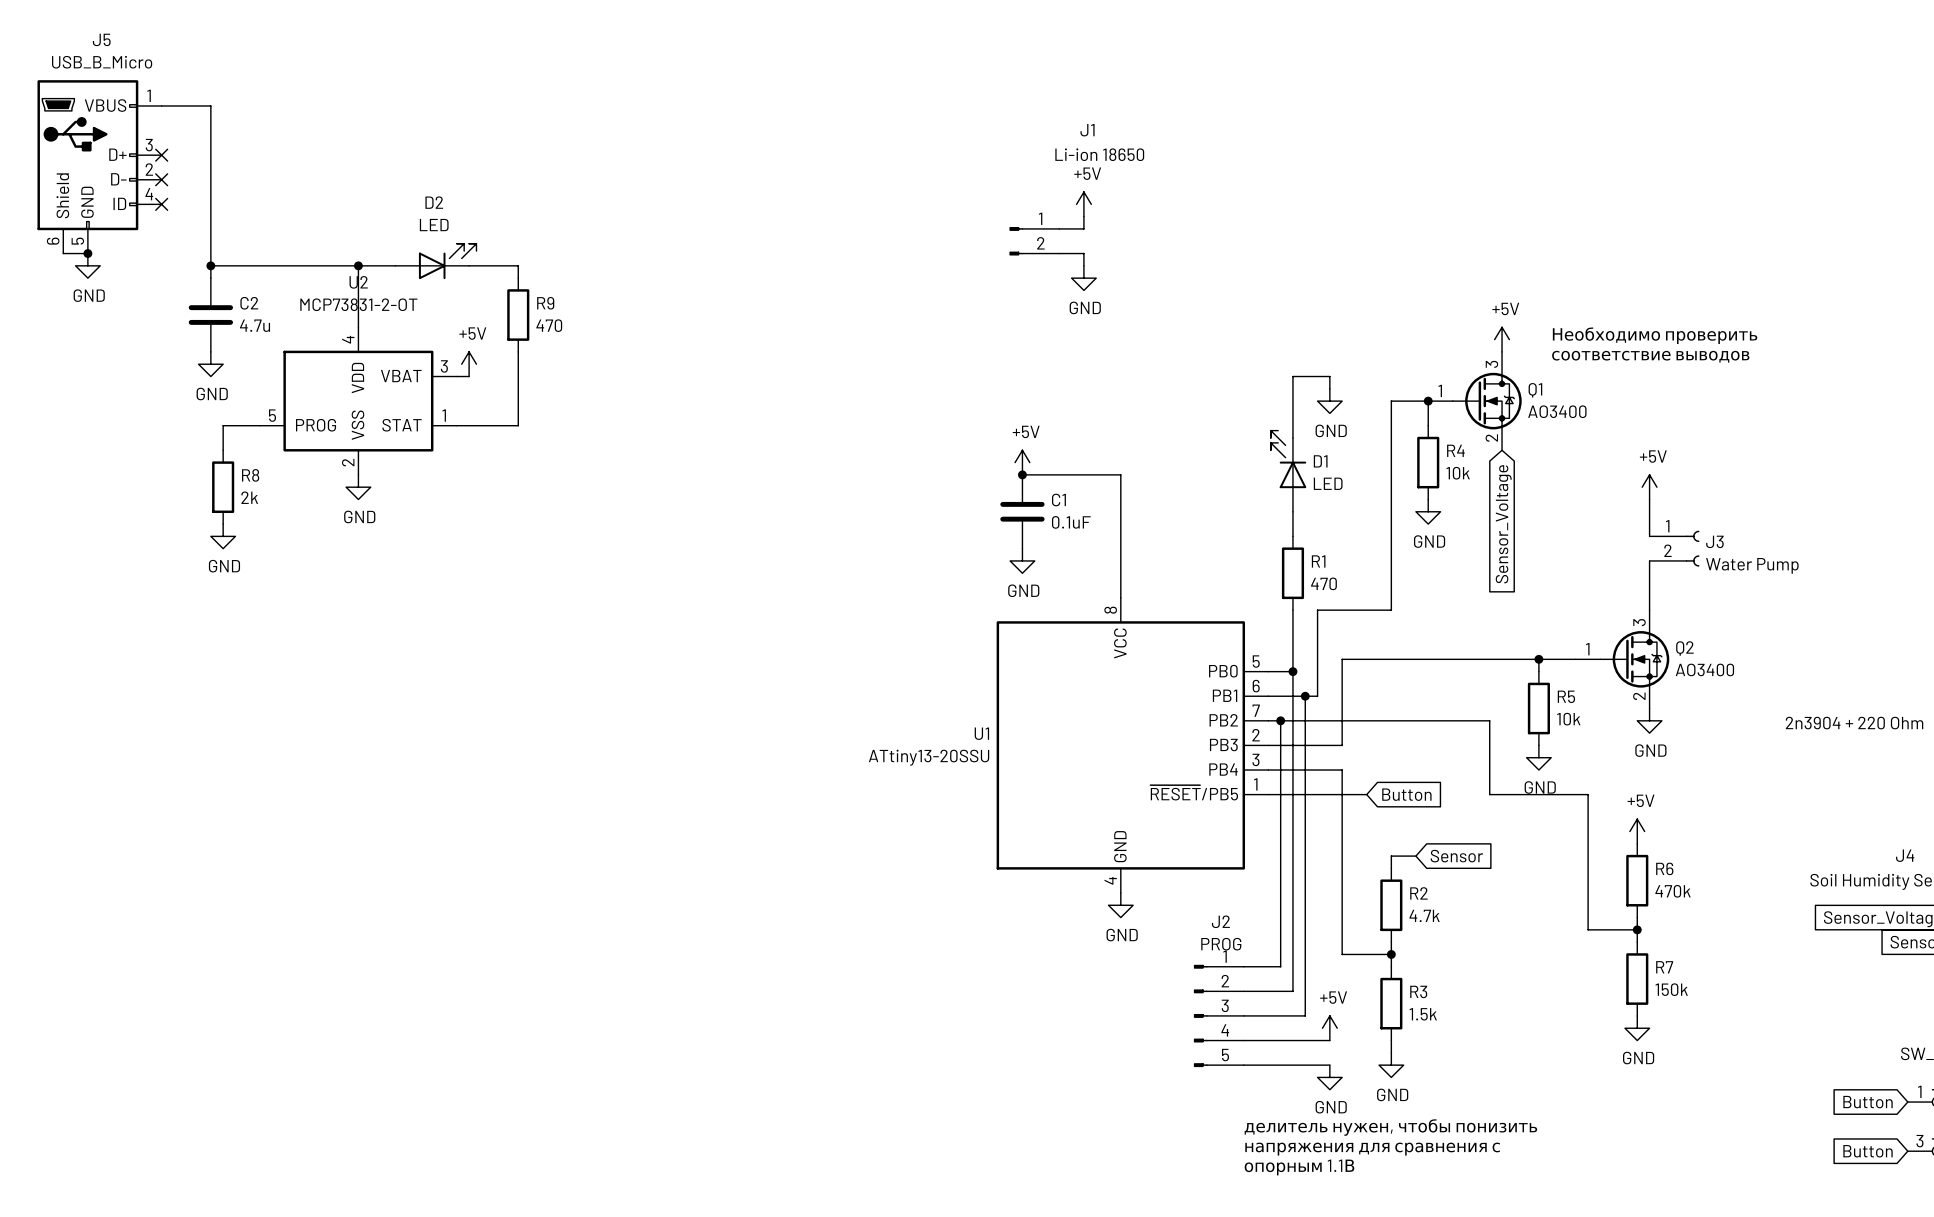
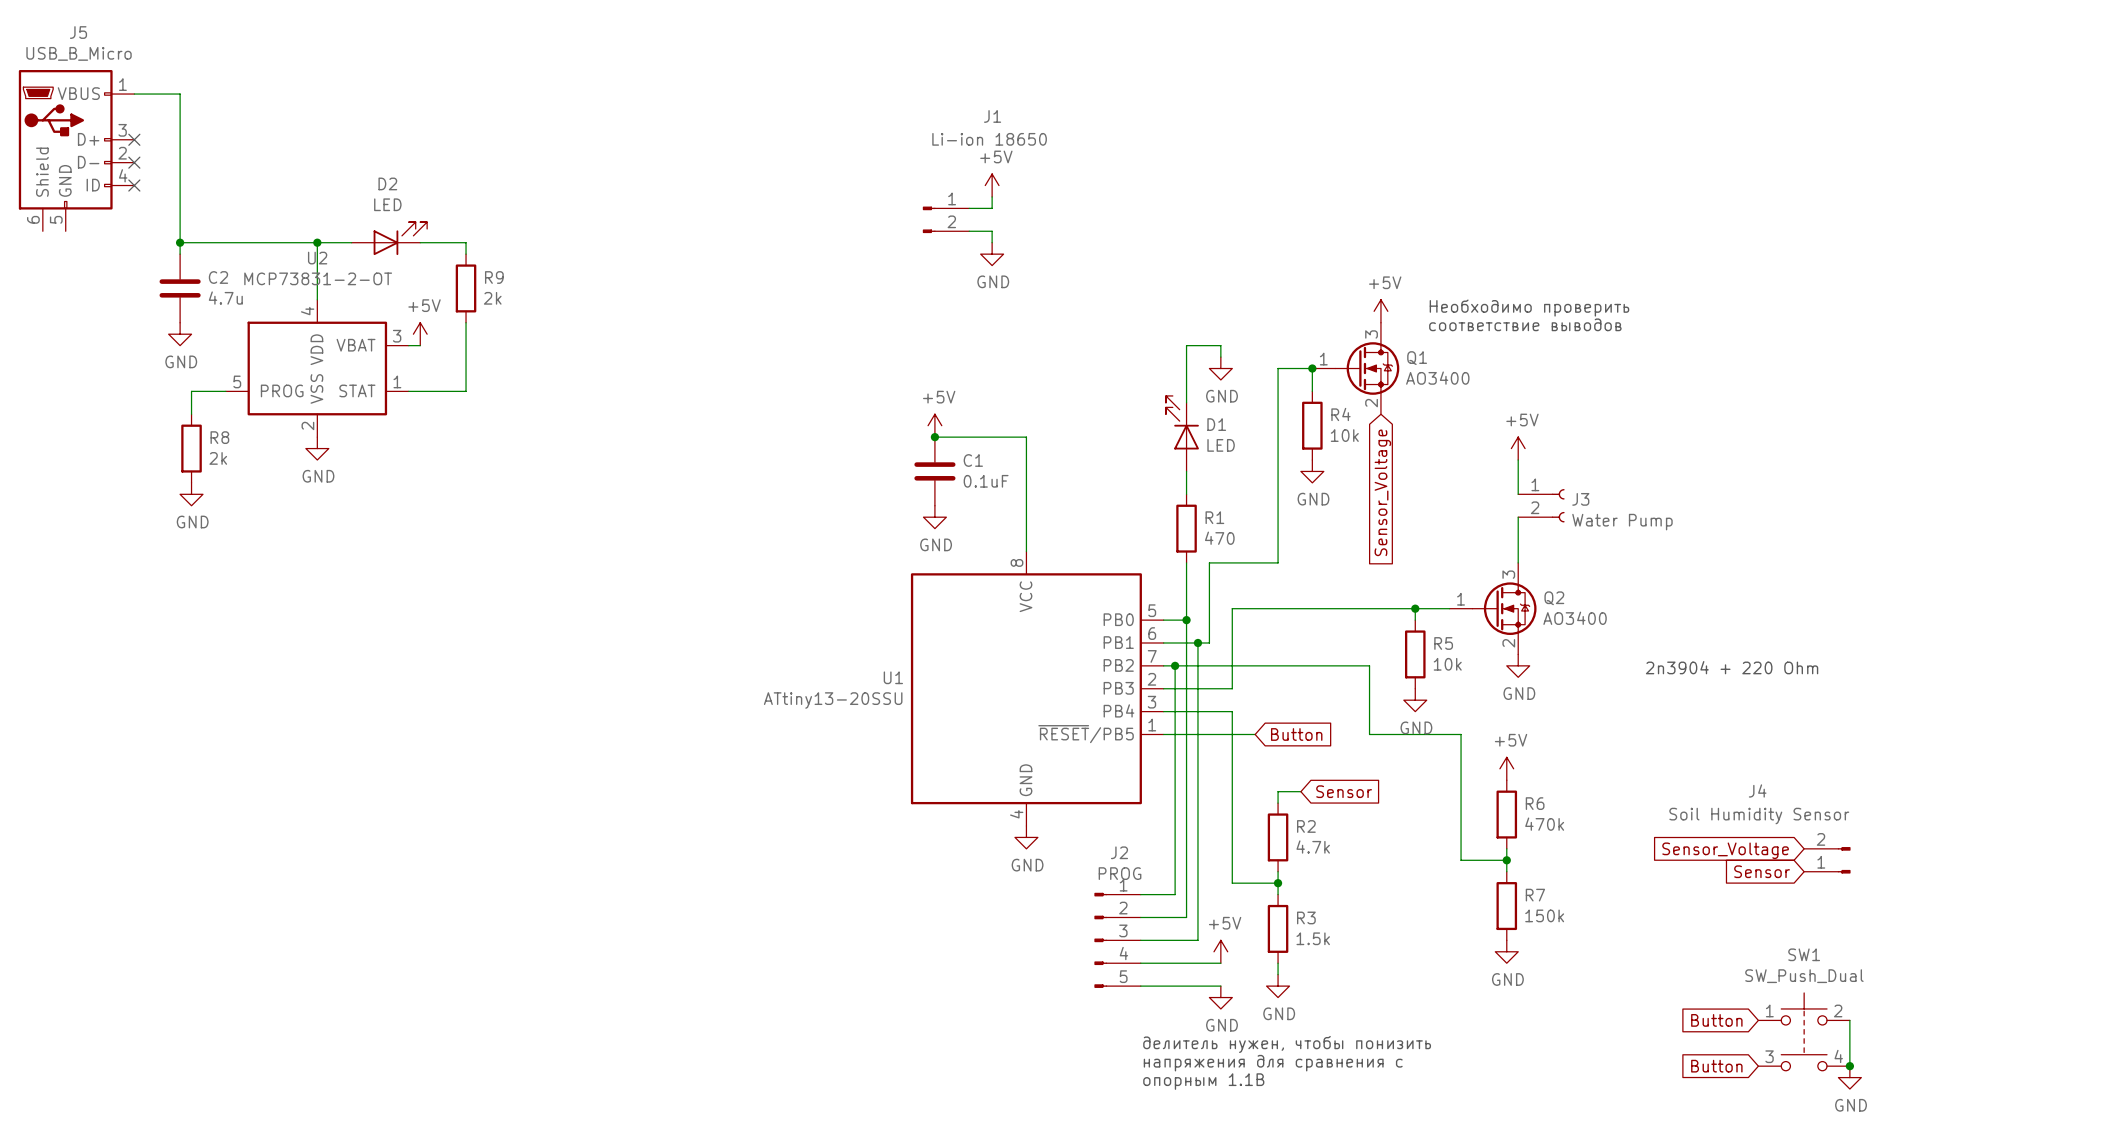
wire: (63, 253) (87, 253) -> none
junction: (87, 253) -> none
power symbol: GND (87, 265) -> none
R9 value: 470 (549, 325) -> 2k (492, 298)

